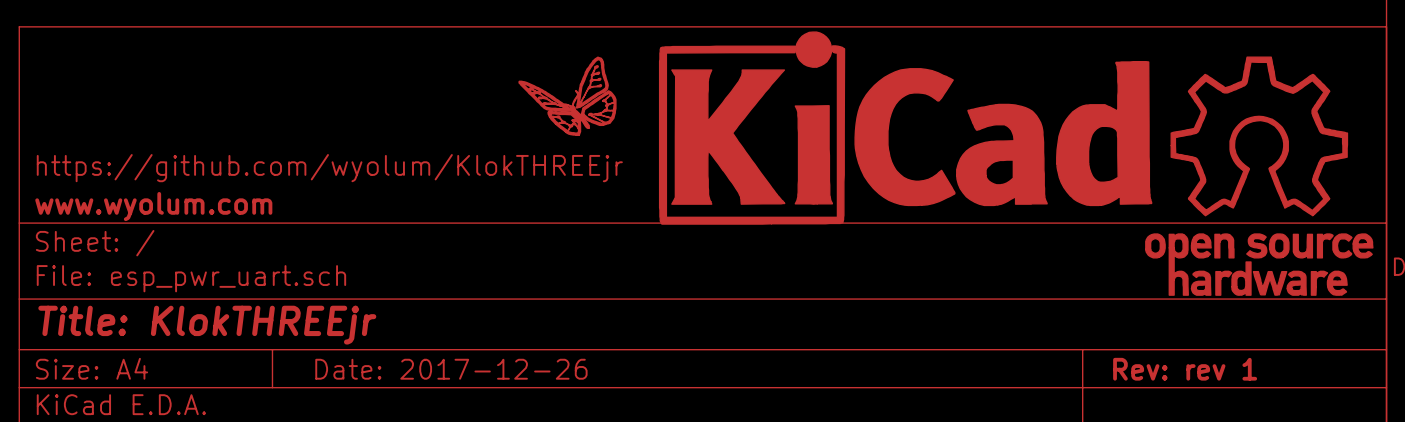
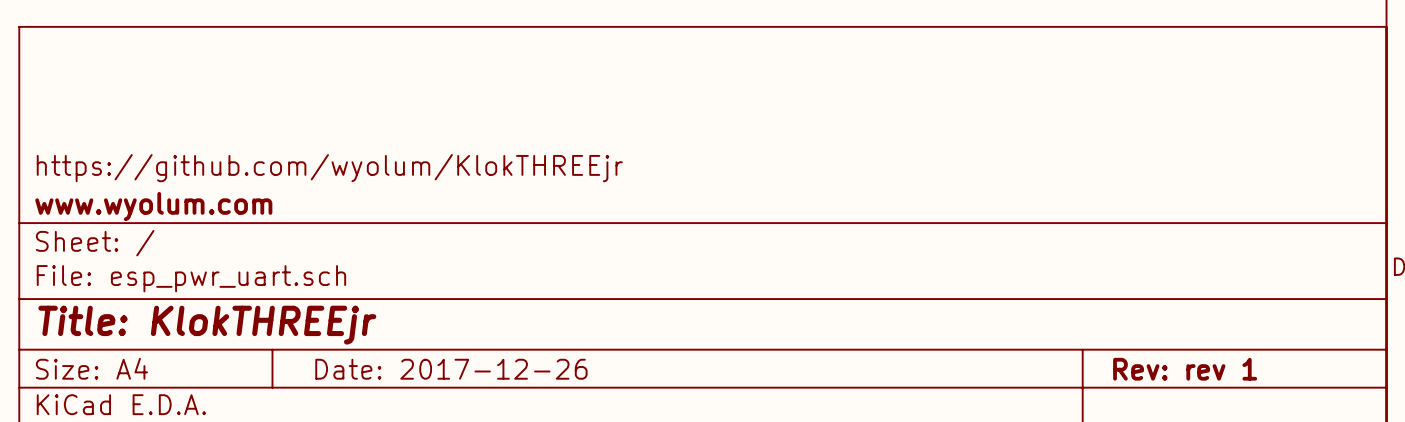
part: (567, 96) -> none
part: (905, 128) -> none
part: (1259, 176) -> none

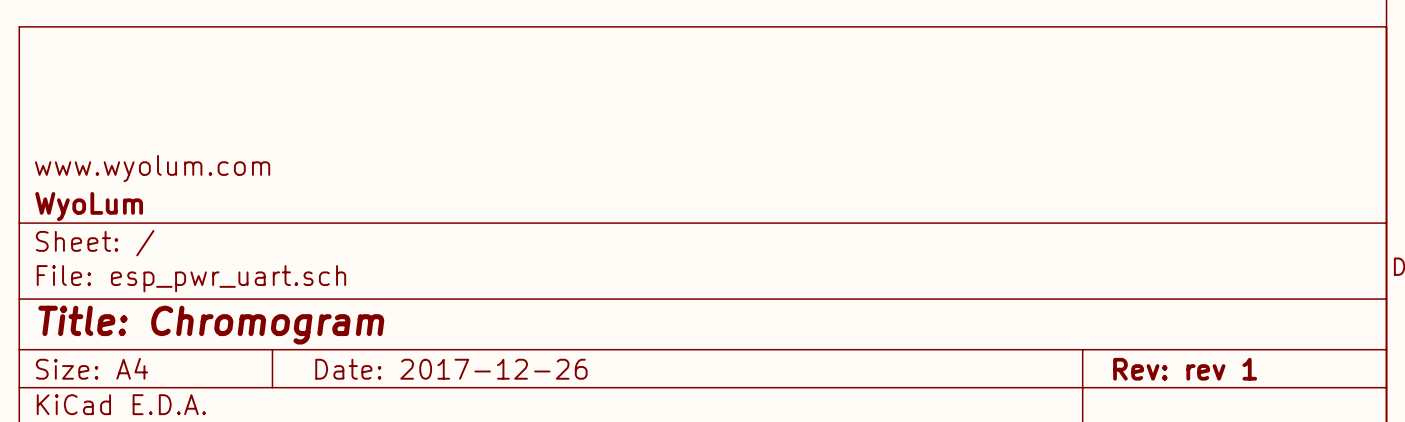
title block: https://github.com/wyolum/KlokTHREEjr (329, 168) -> www.wyolum.com (152, 168)
title block: www.wyolum.com (153, 206) -> WyoLum (89, 206)
title block: Title: KlokTHREEjr (207, 325) -> Title: Chromogram (211, 325)

